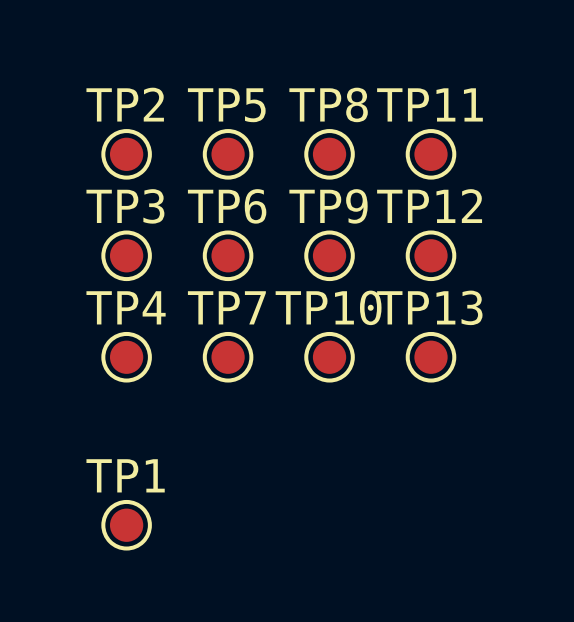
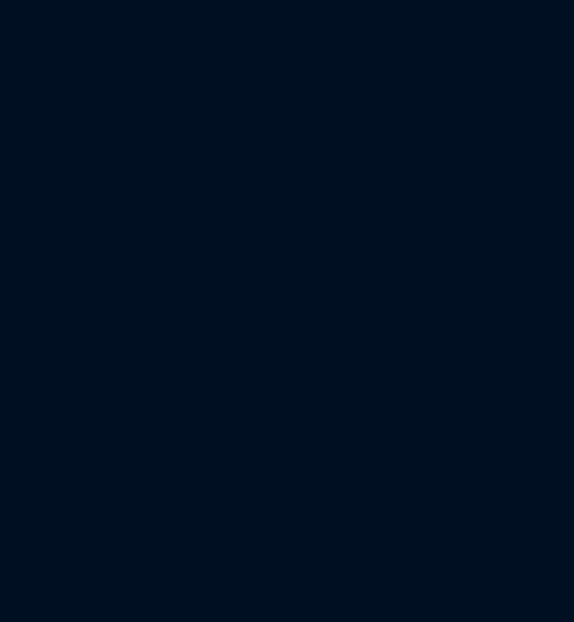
TP2: (126, 154) -> none
TP5: (228, 154) -> none
TP8: (329, 154) -> none
TP11: (431, 154) -> none
TP3: (126, 255) -> none
TP6: (228, 255) -> none
TP9: (329, 255) -> none
TP12: (431, 255) -> none
TP4: (126, 357) -> none
TP7: (228, 357) -> none
TP10: (329, 357) -> none
TP13: (431, 357) -> none
TP1: (126, 525) -> none

